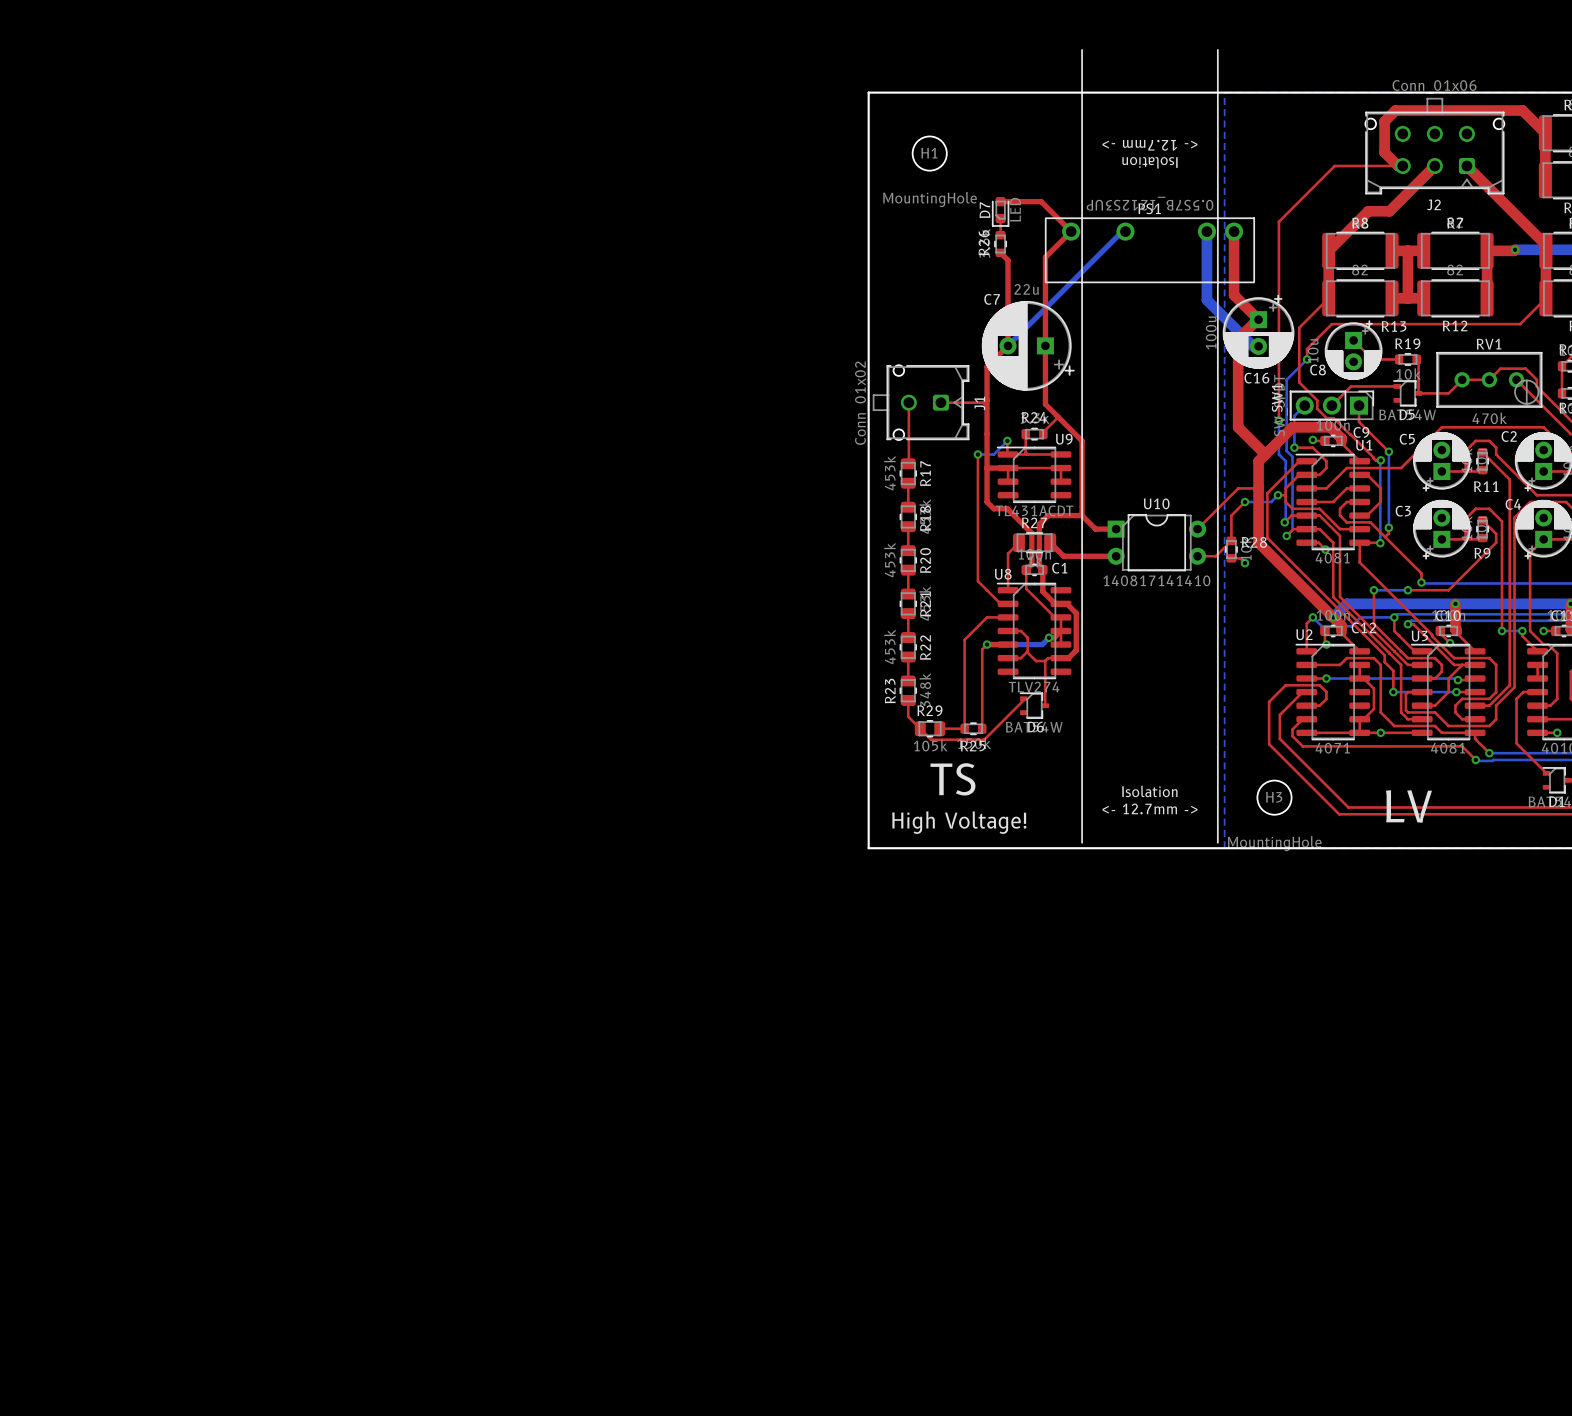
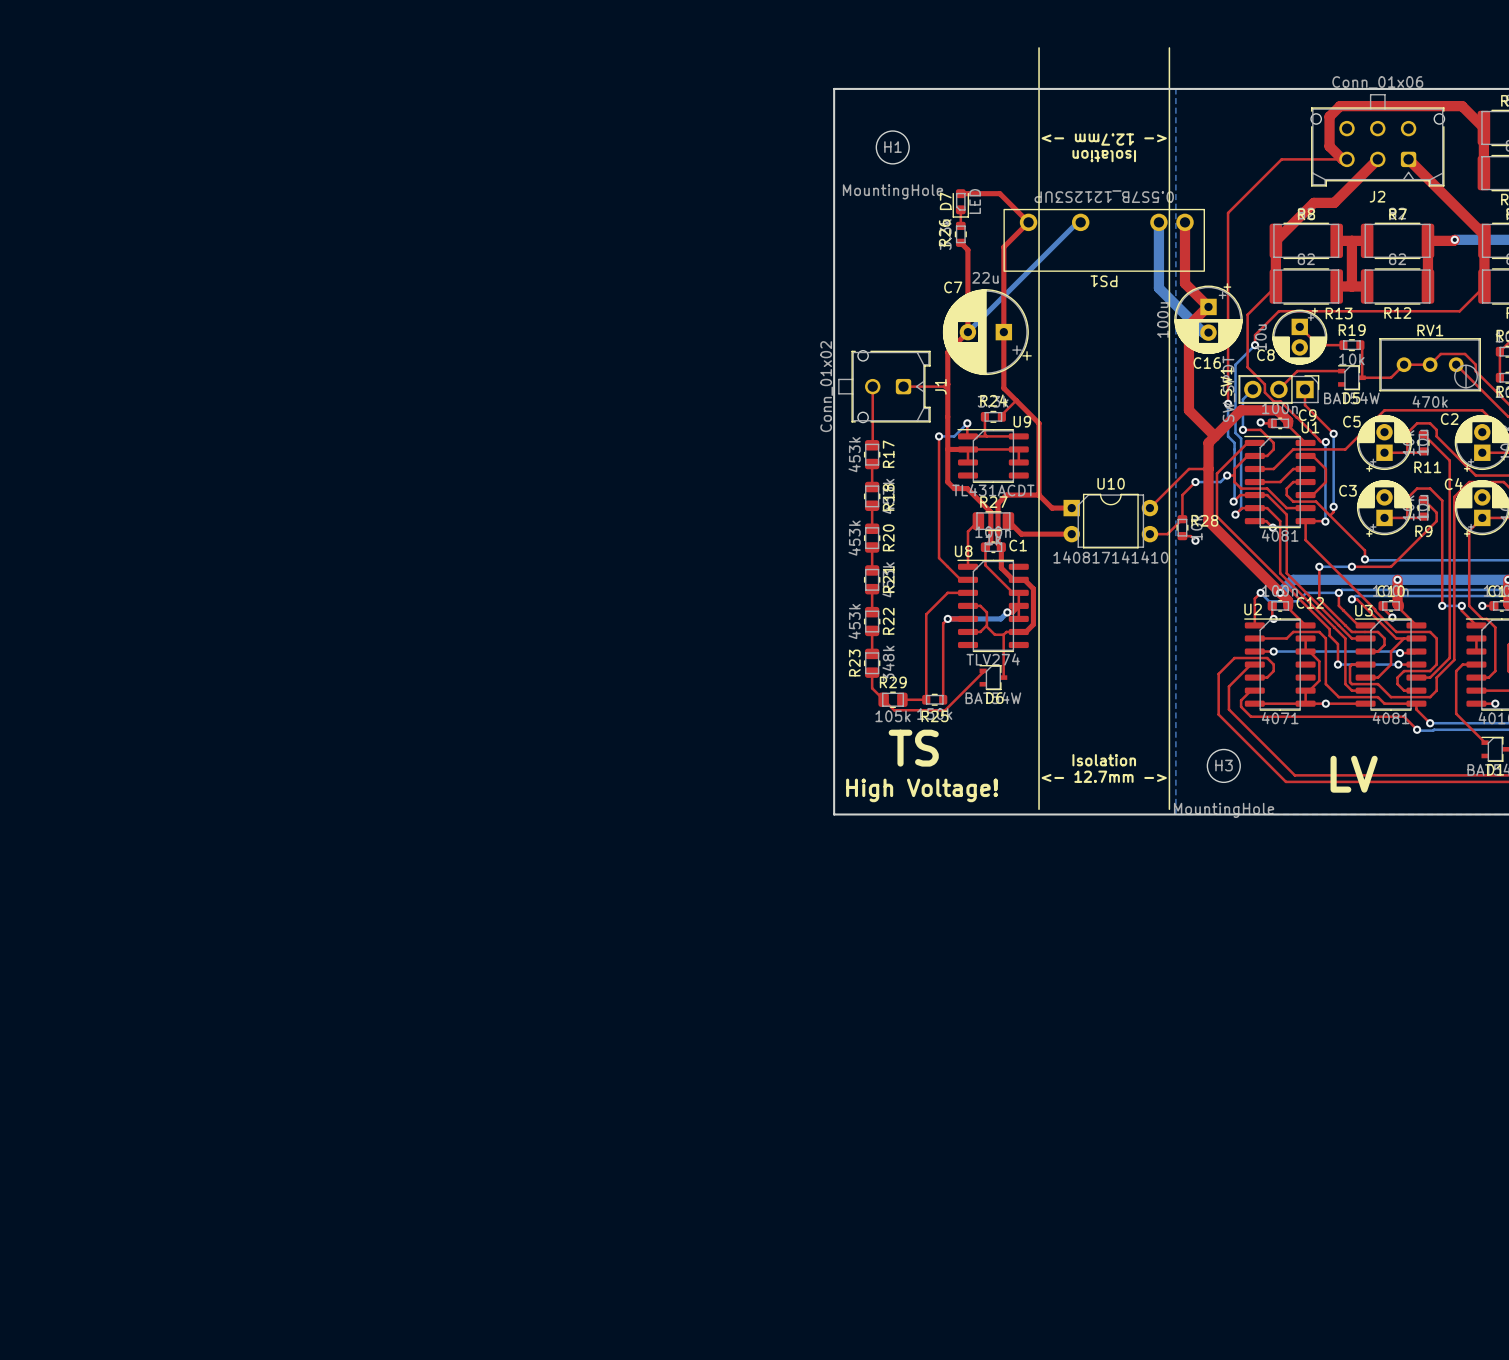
PS1 name rotation: 0° (1149, 208) -> 180° (1103, 281)
PS1 name position: PS1 (1149, 208) -> PS1 (1103, 281)

